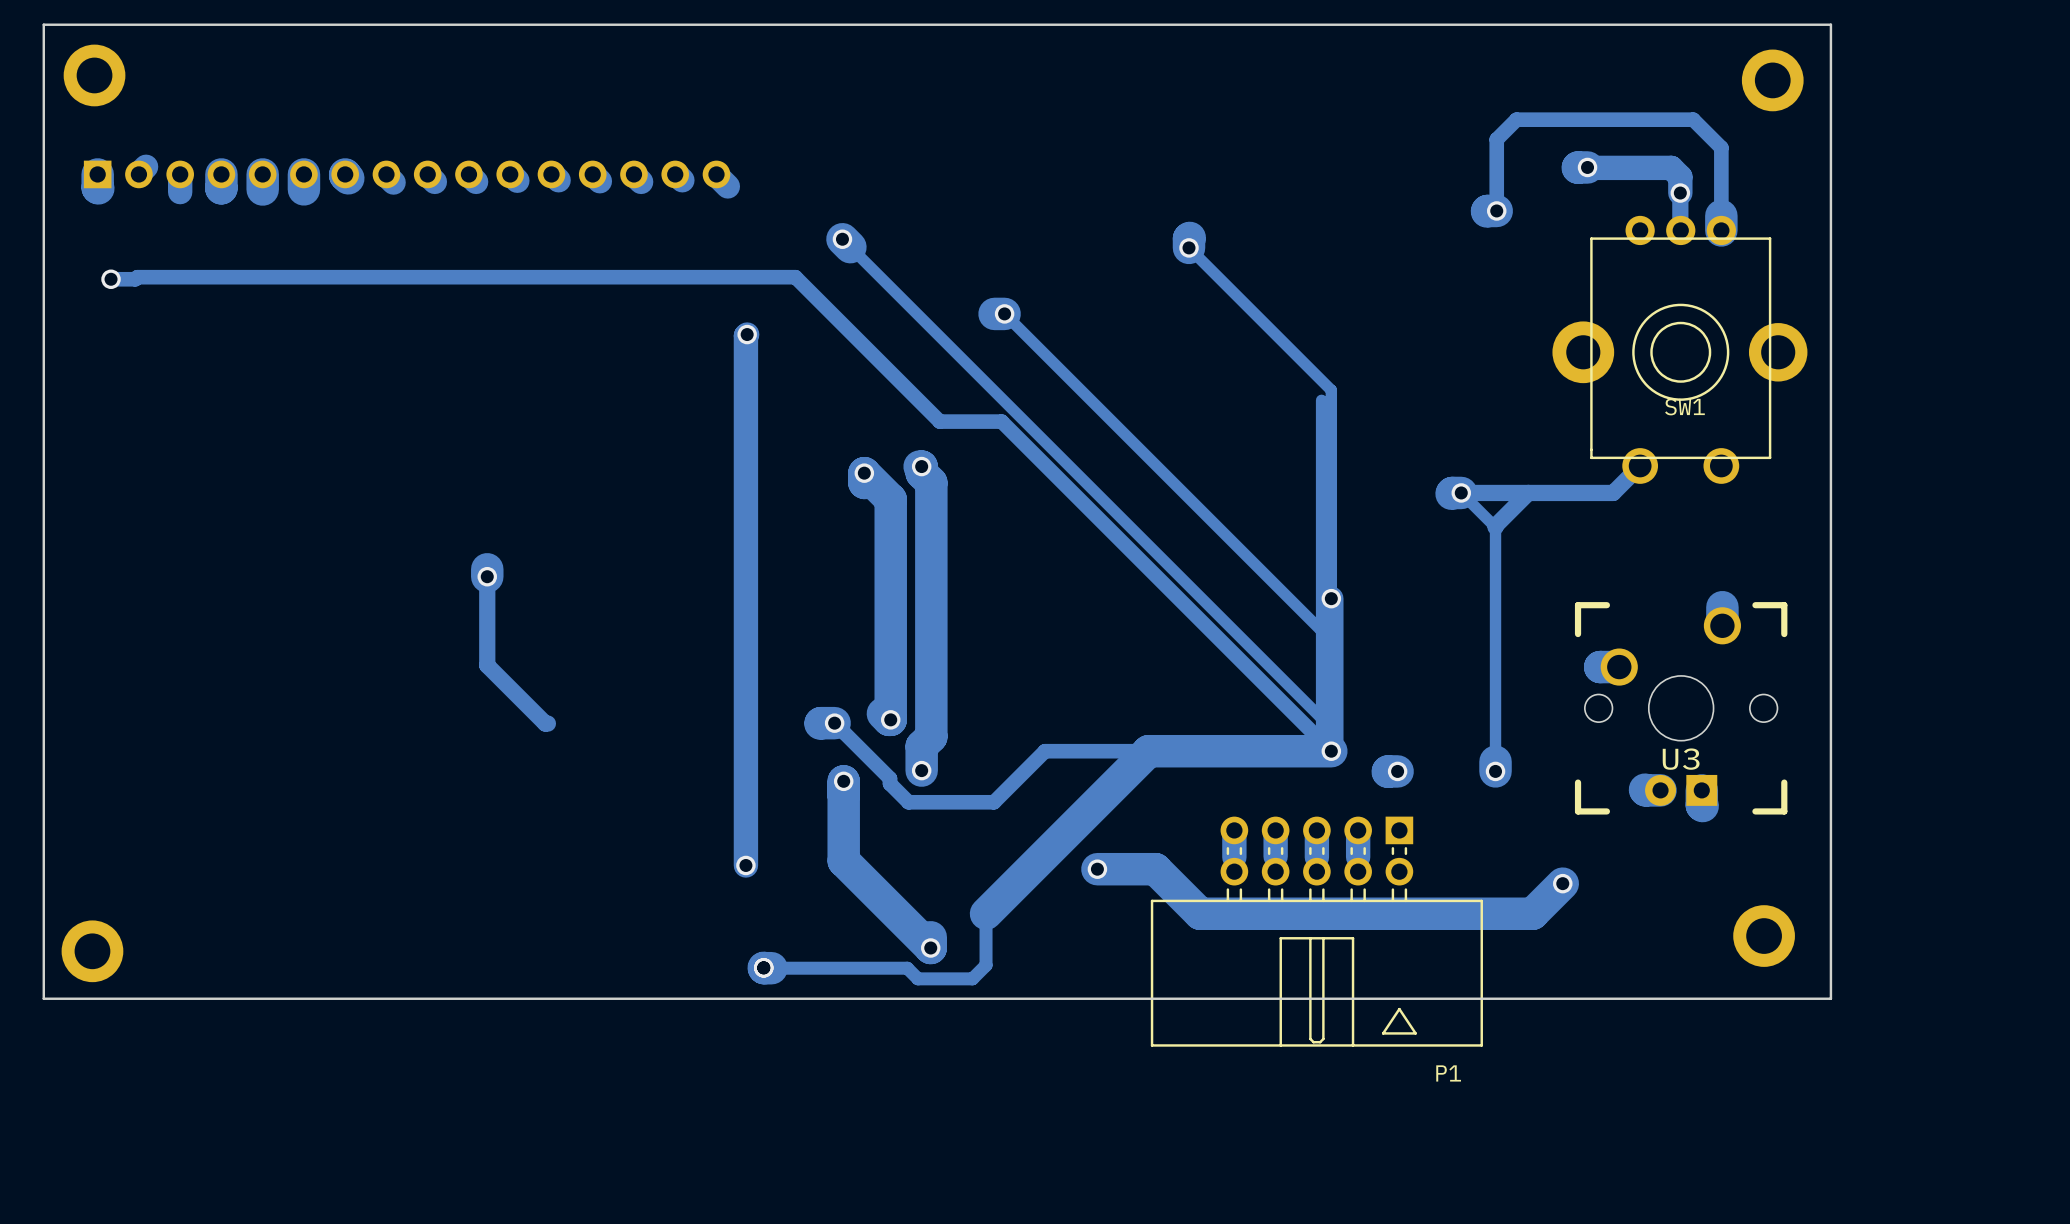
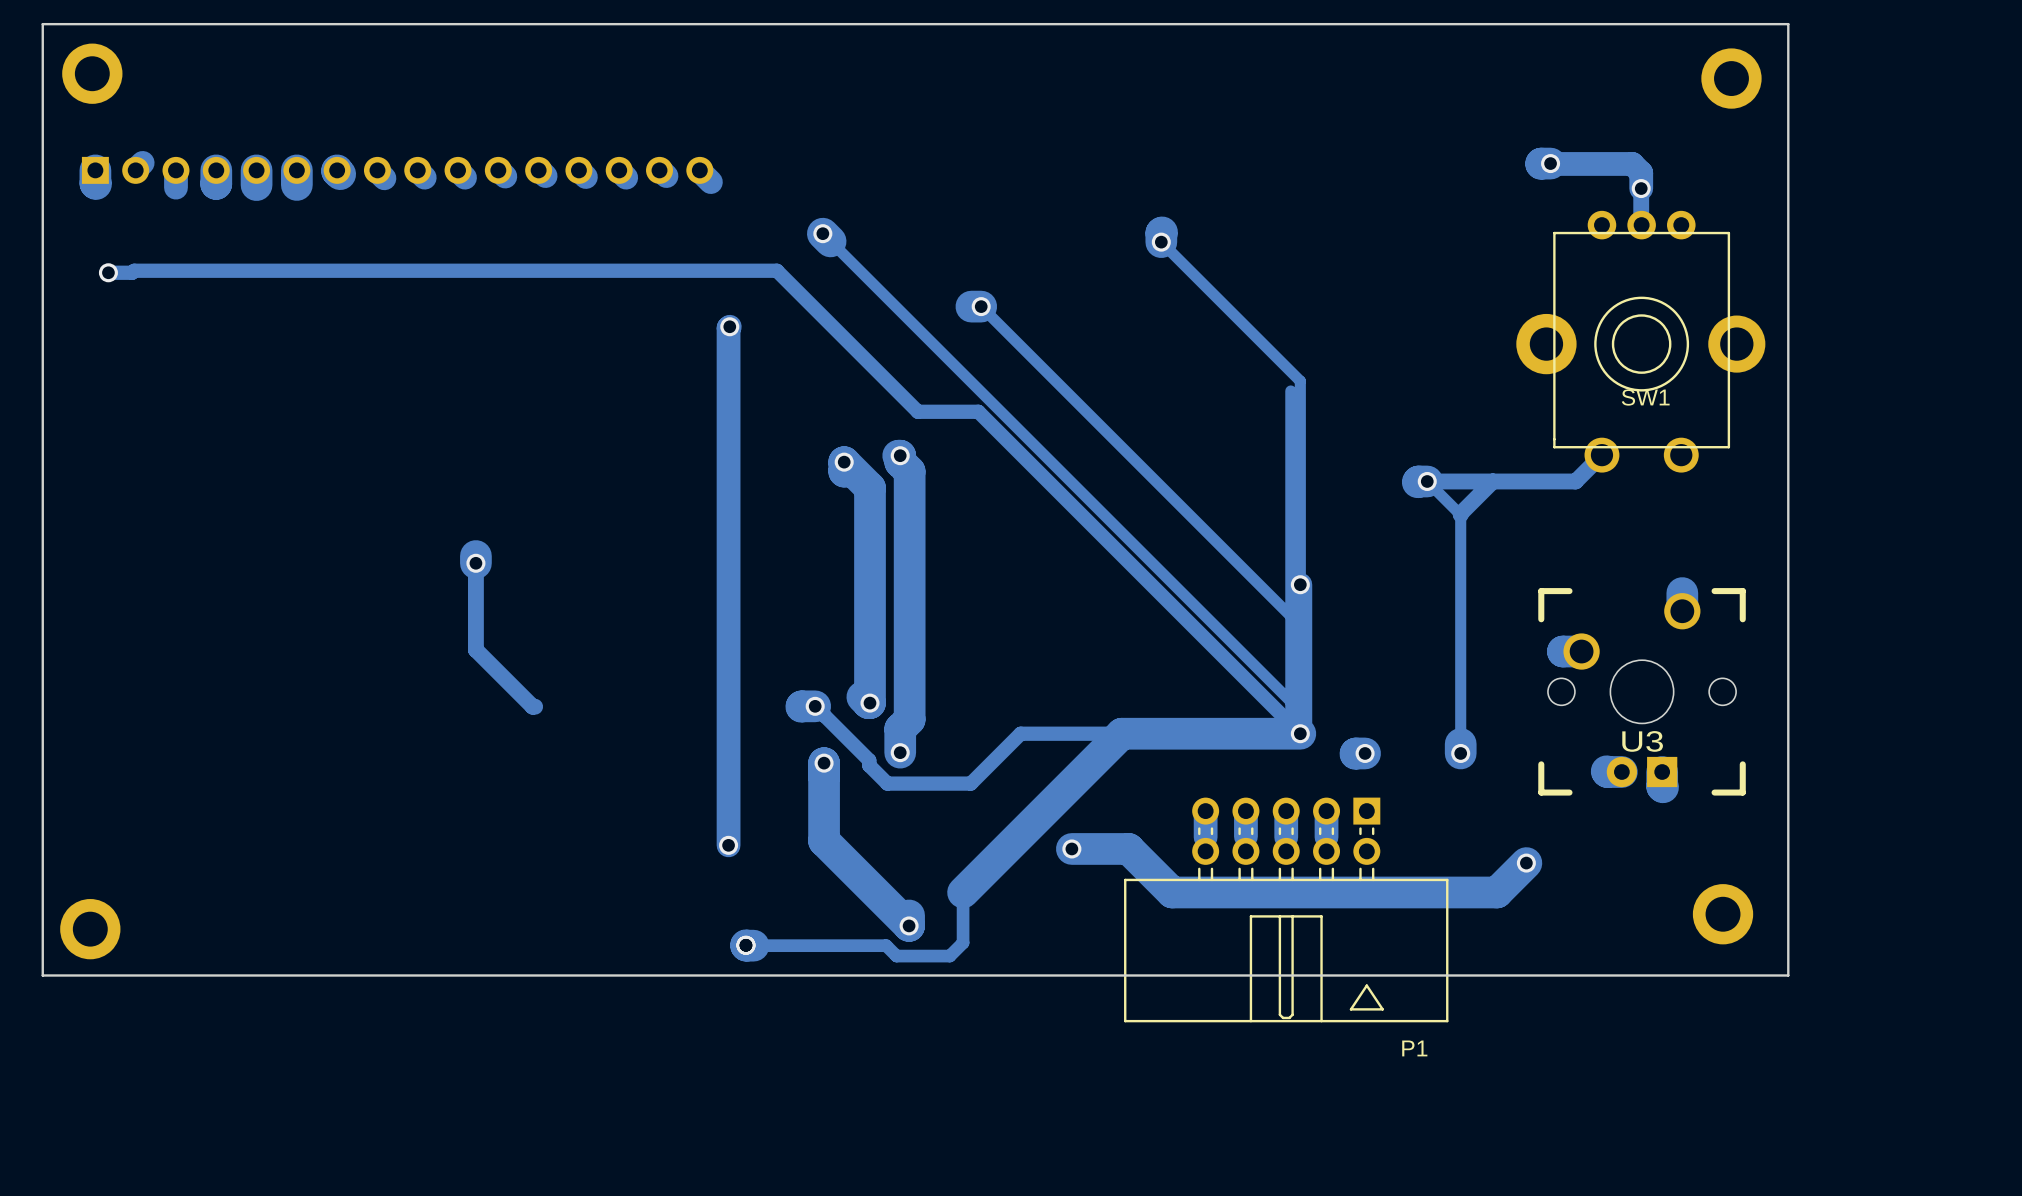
via: (1496, 210) -> none
track: (1486, 211) (1496, 210) (1496, 139) (1516, 119) (1693, 119) (1721, 147) (1721, 230) (1721, 215) -> none

